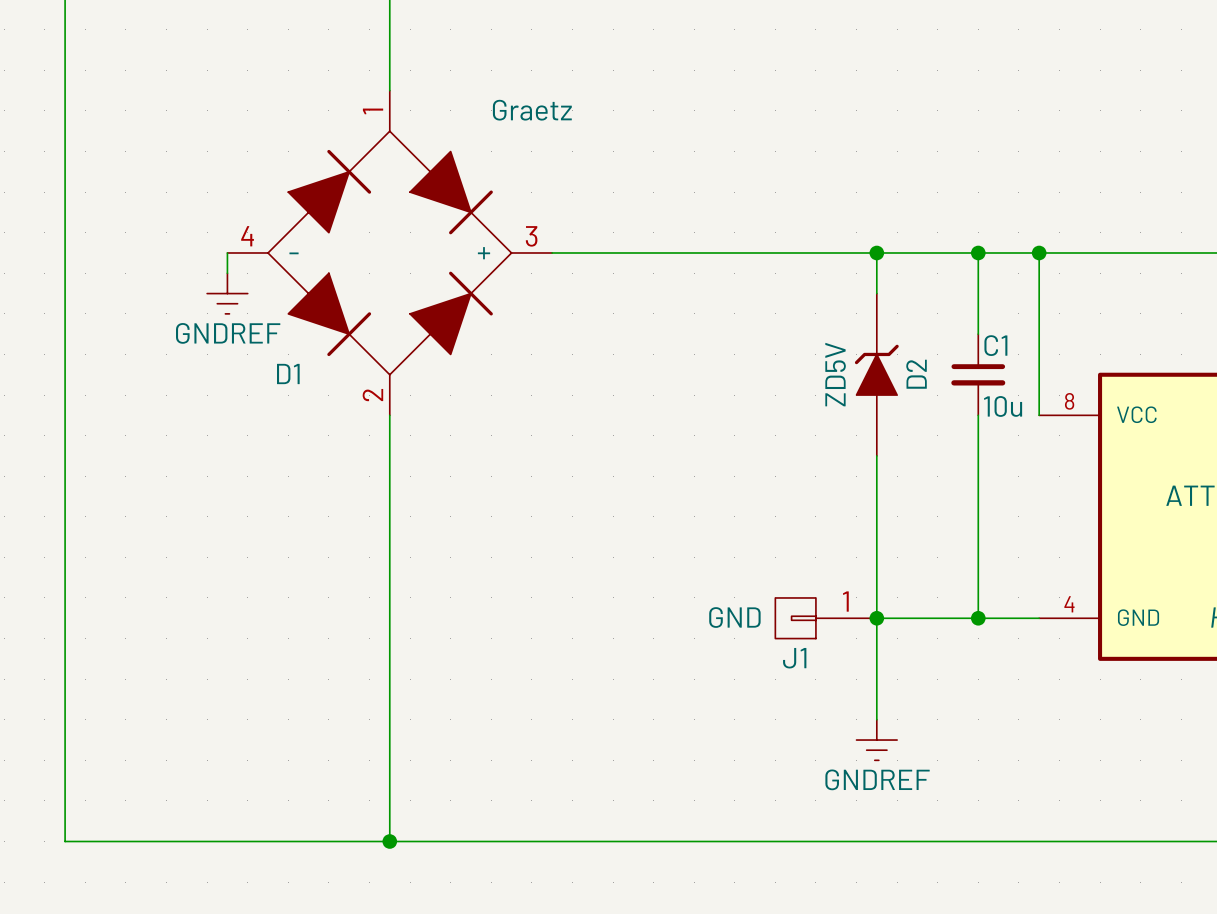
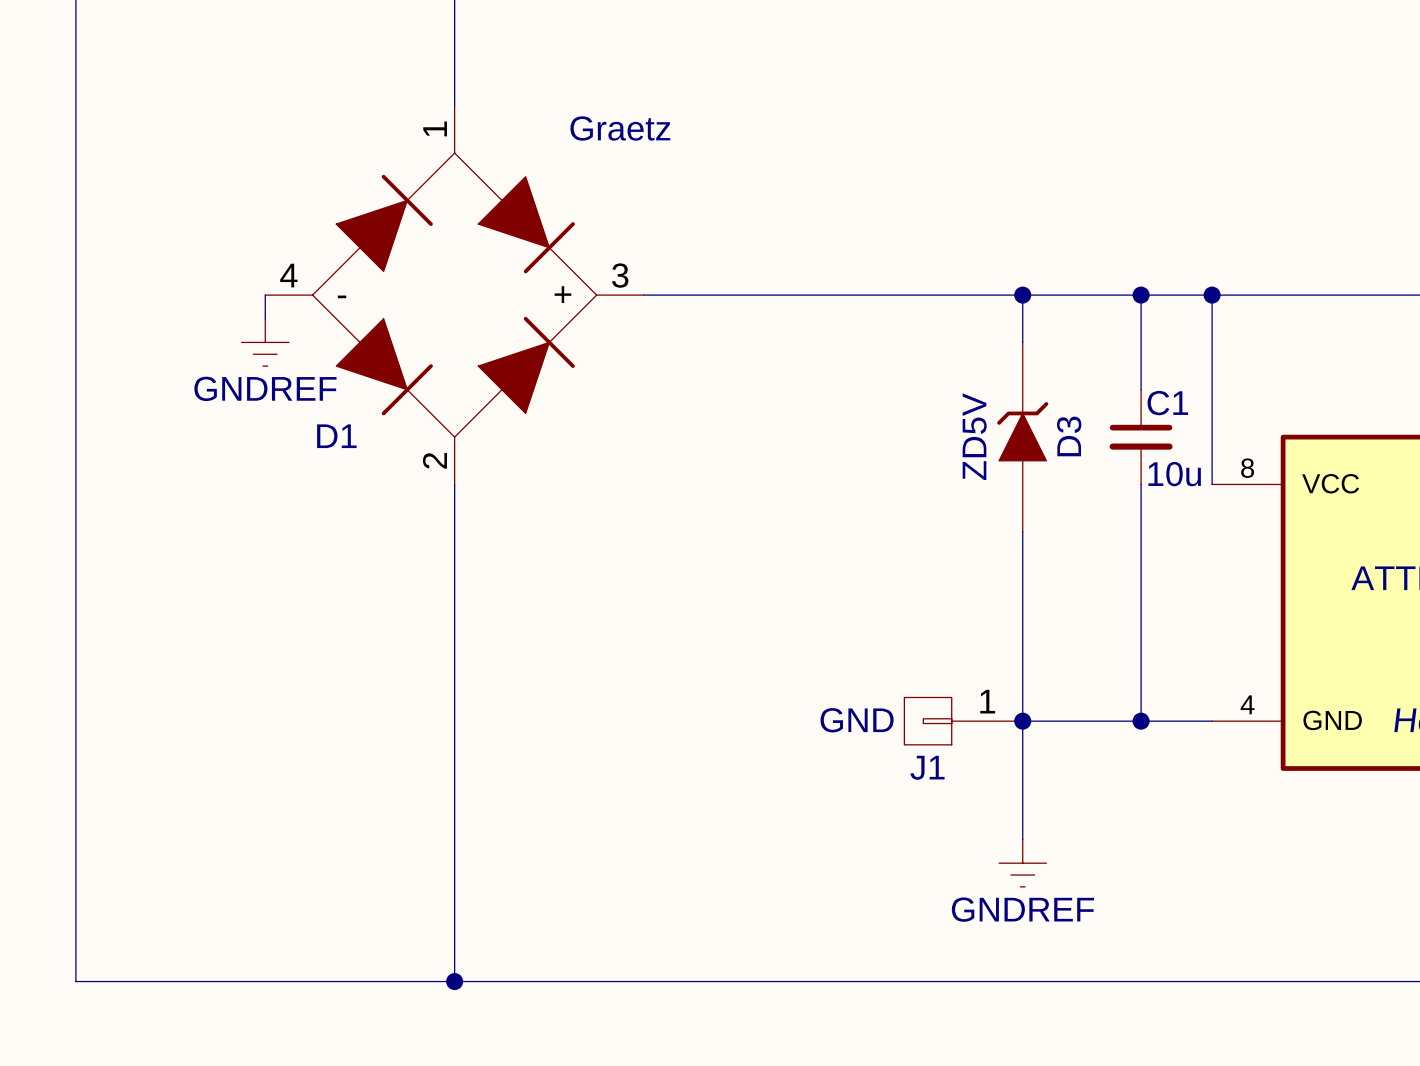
D2 name: D2 (916, 374) -> D3 (1069, 436)

